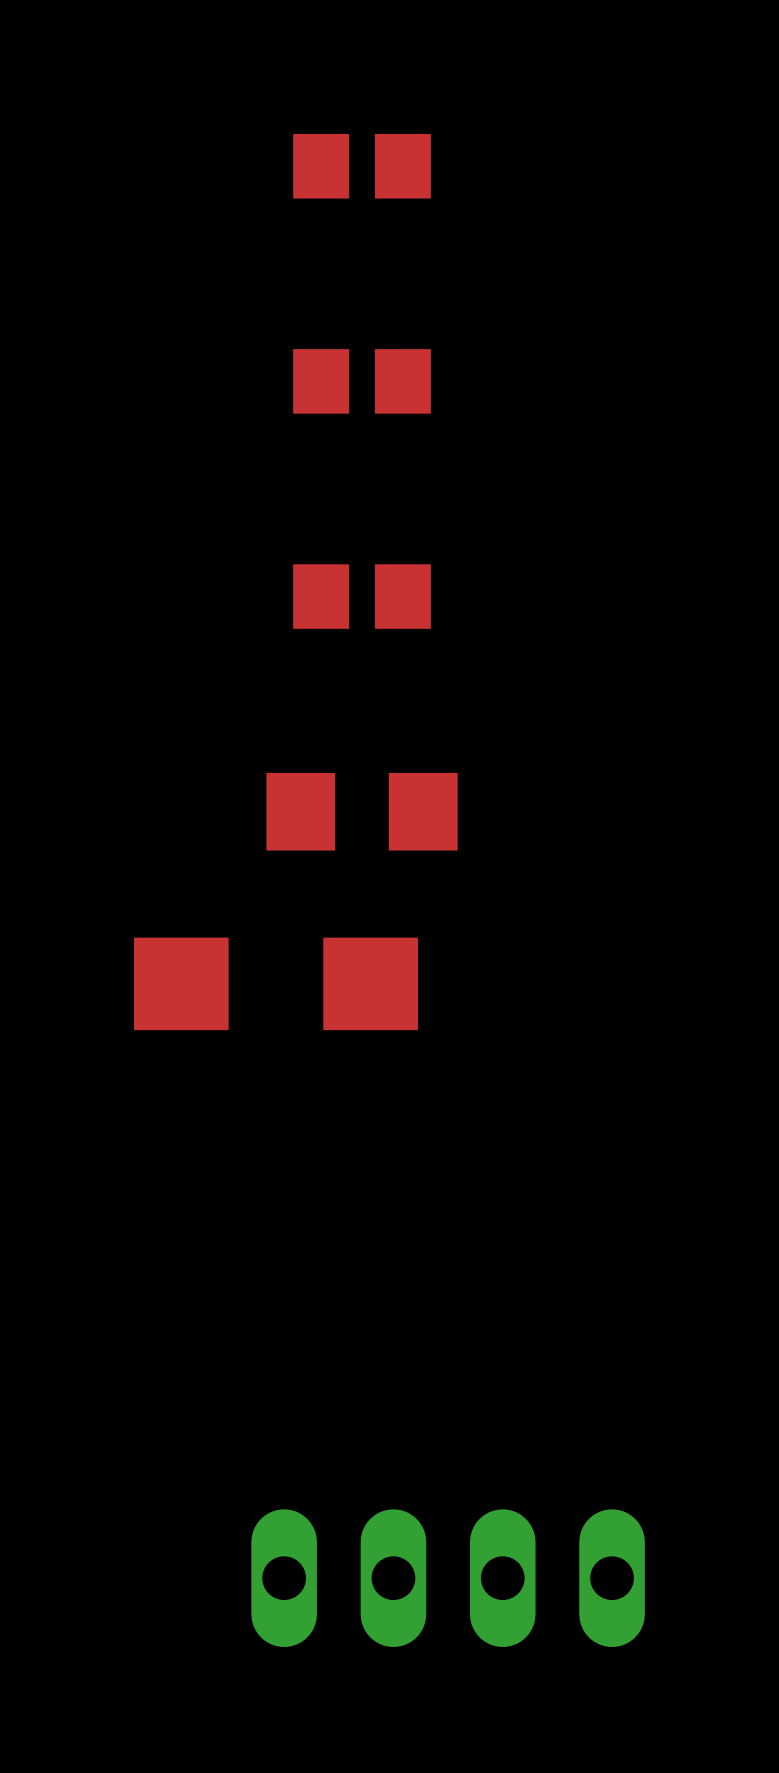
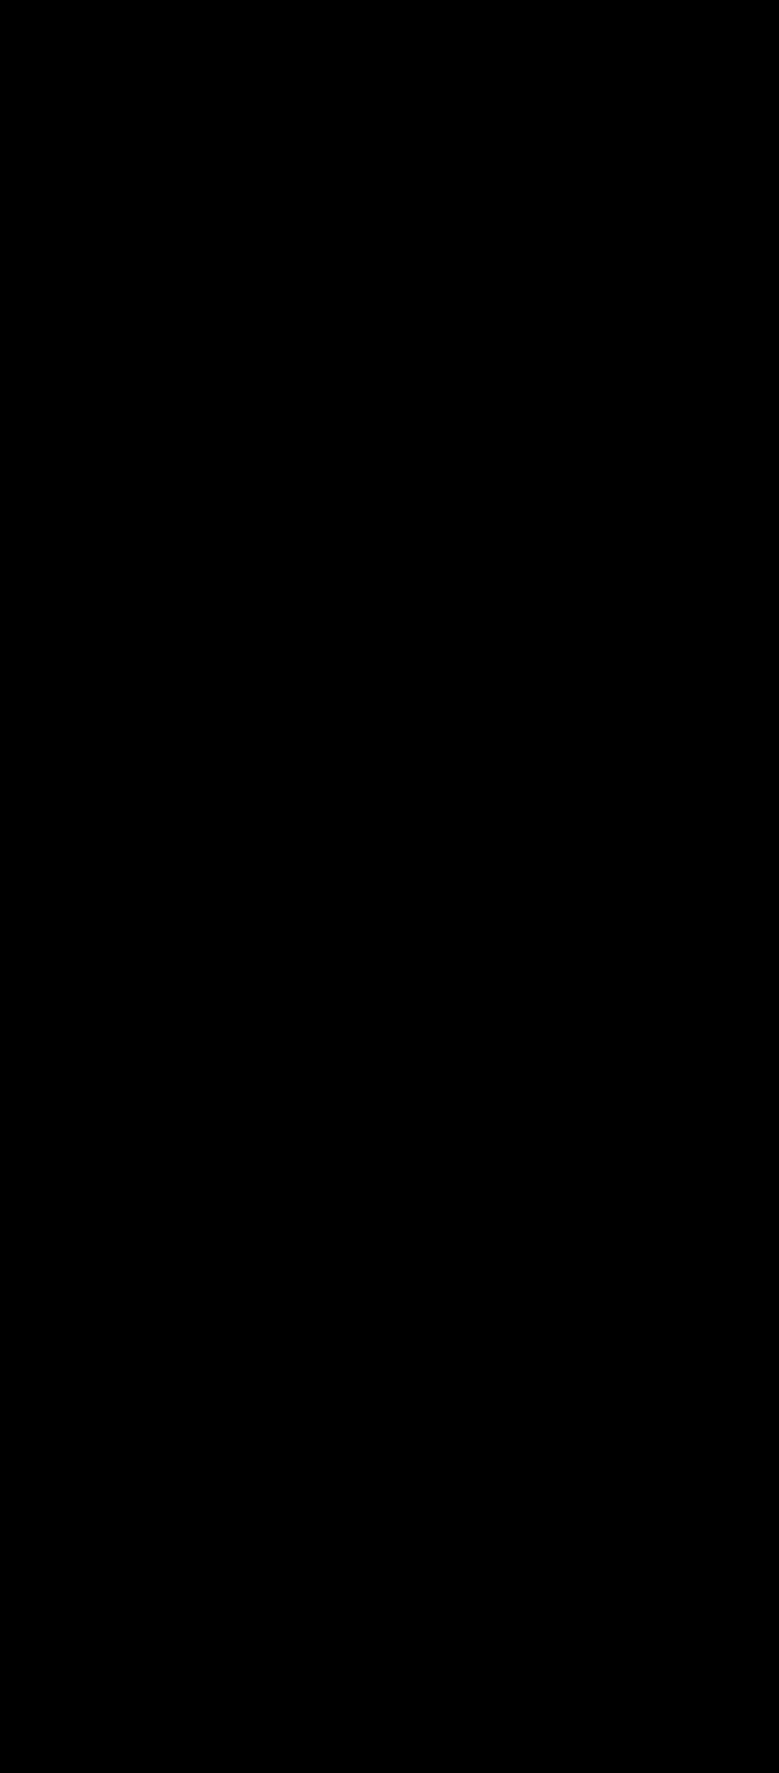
part: (362, 166) -> none
part: (362, 381) -> none
part: (362, 596) -> none
part: (362, 811) -> none
part: (275, 983) -> none
part: (448, 1578) -> none

